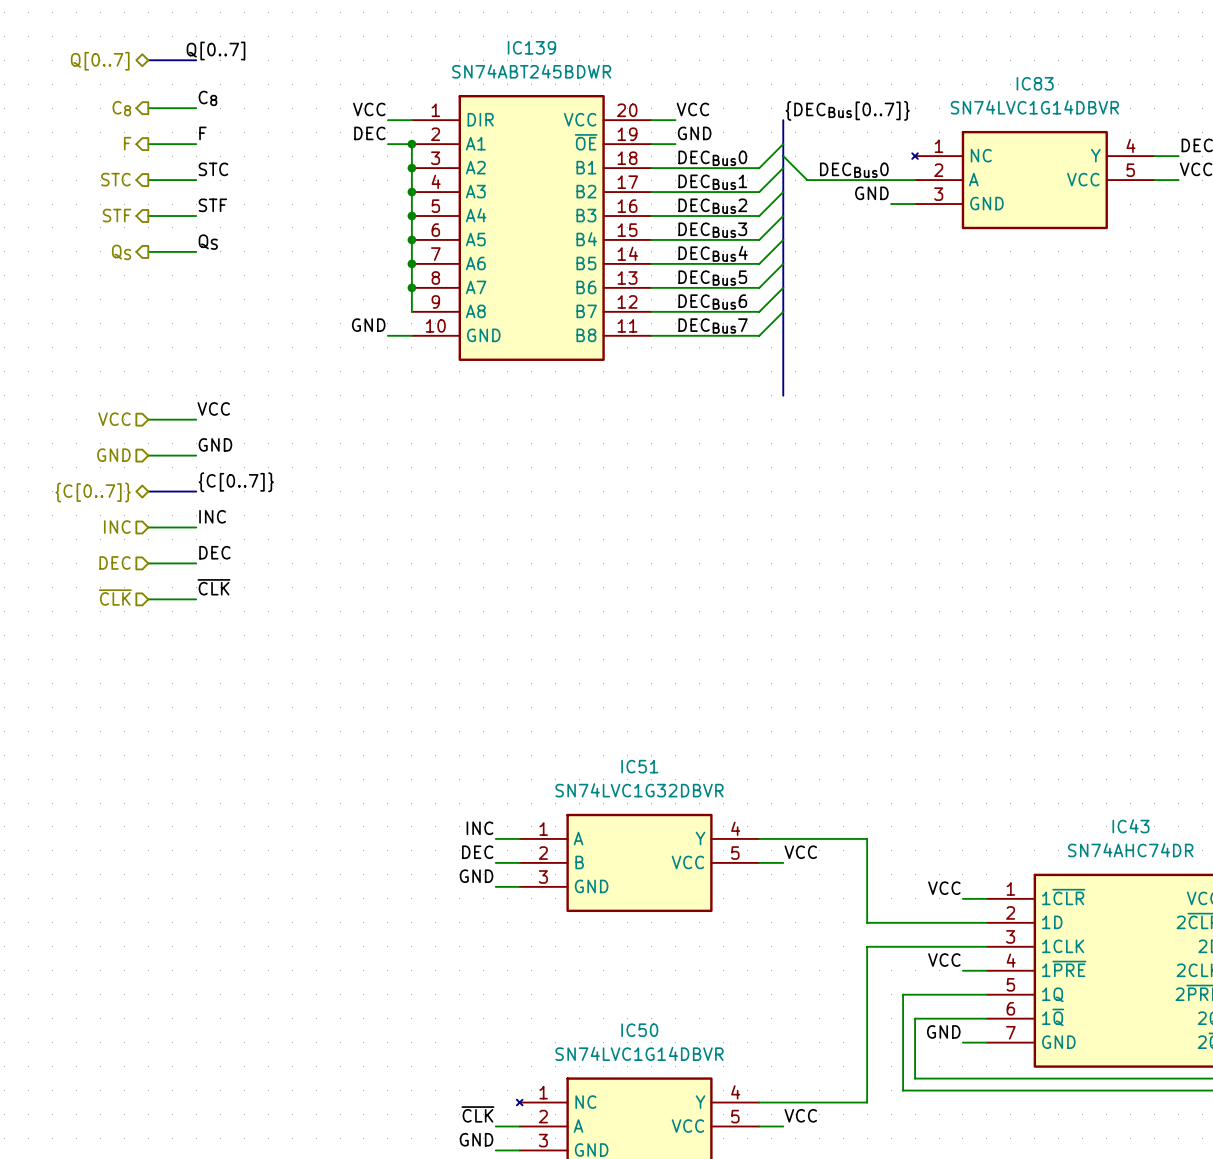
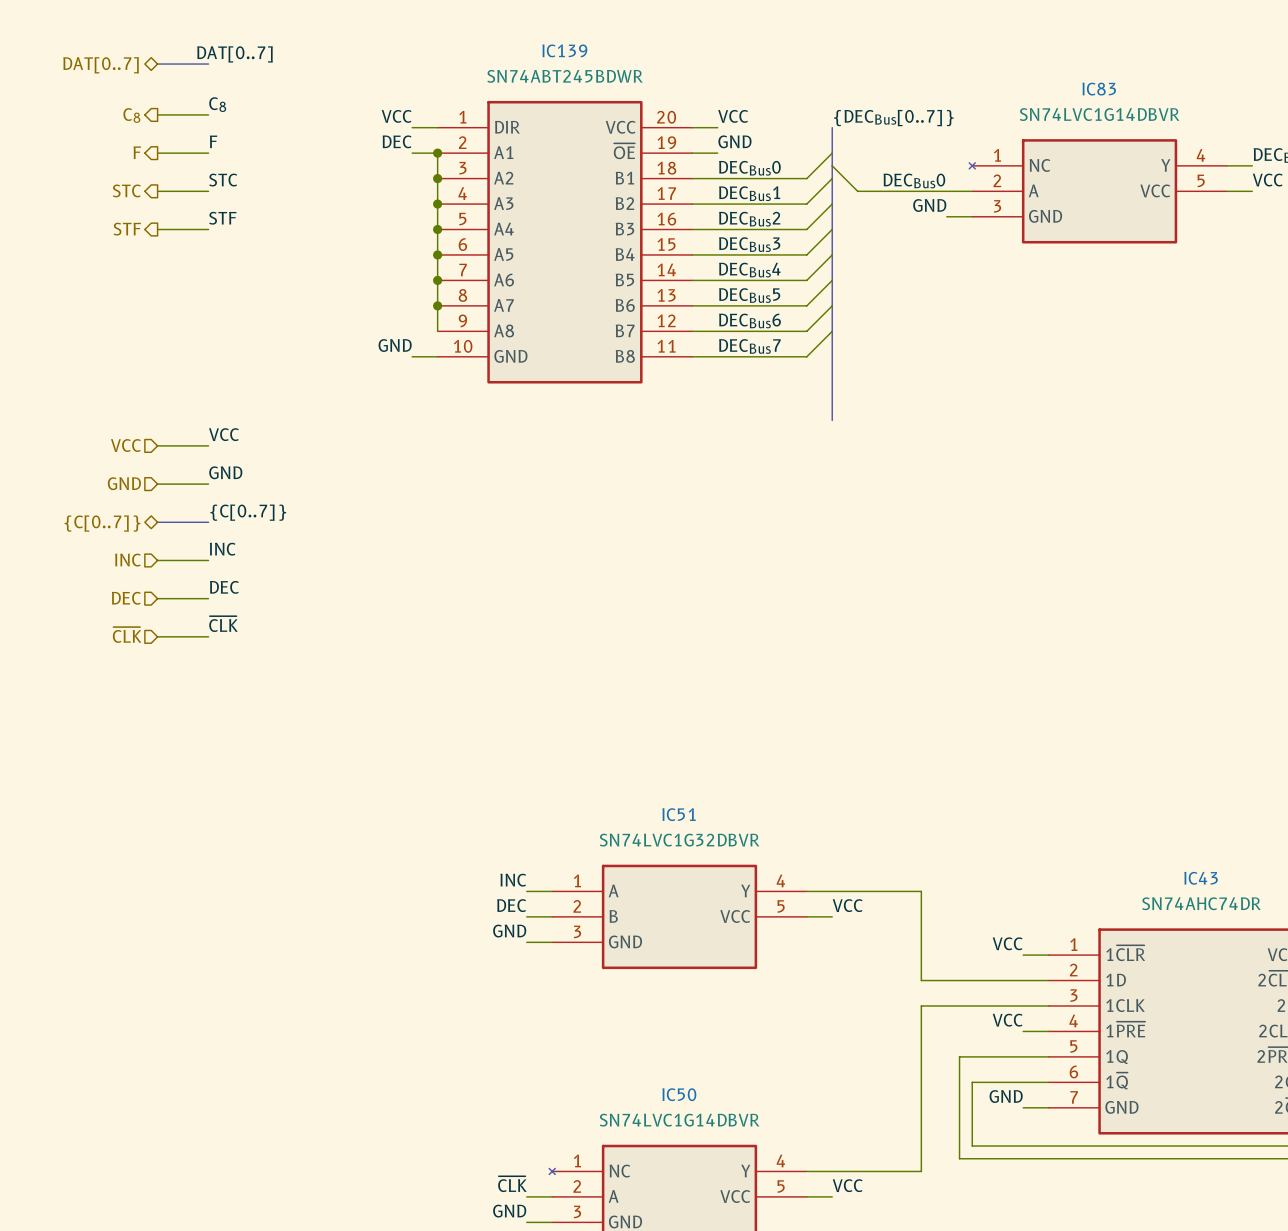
label: Q[0..7] (216, 51) -> DAT[0..7] (235, 54)
hierarchical label: Q[0..7] (100, 61) -> DAT[0..7] (101, 65)
label: QS (208, 242) -> none
wire: (148, 251) (196, 251) -> none
hierarchical label: QS (121, 252) -> none

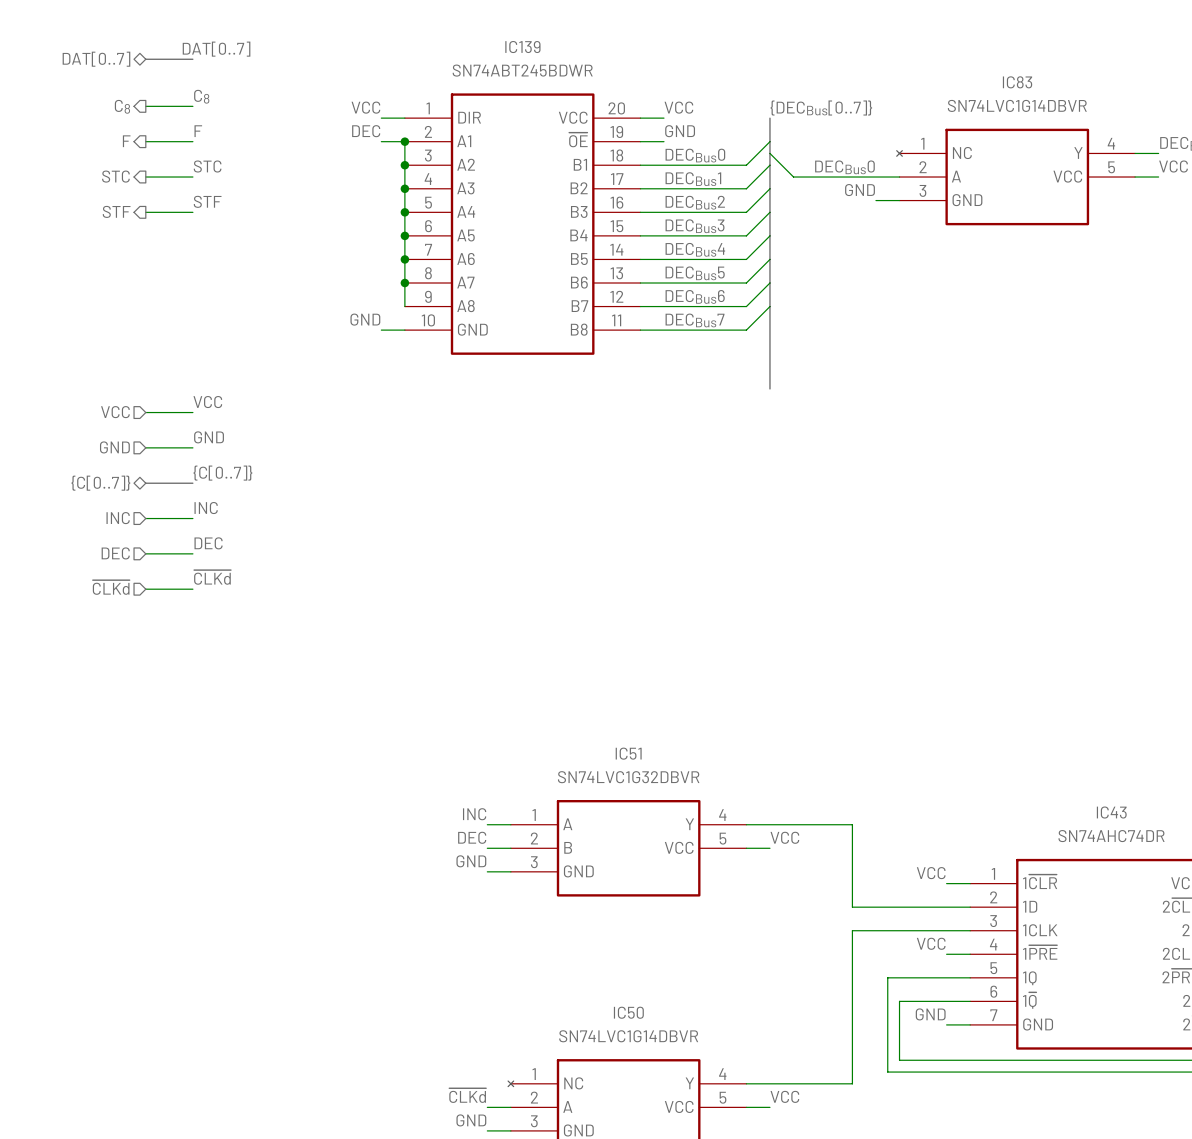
label: ~{CLK} (223, 624) -> ~{CLKd} (212, 577)
hierarchical label: ~{CLK} (127, 634) -> ~{CLKd} (111, 587)
label: ~{CLK} (512, 1184) -> ~{CLKd} (467, 1095)

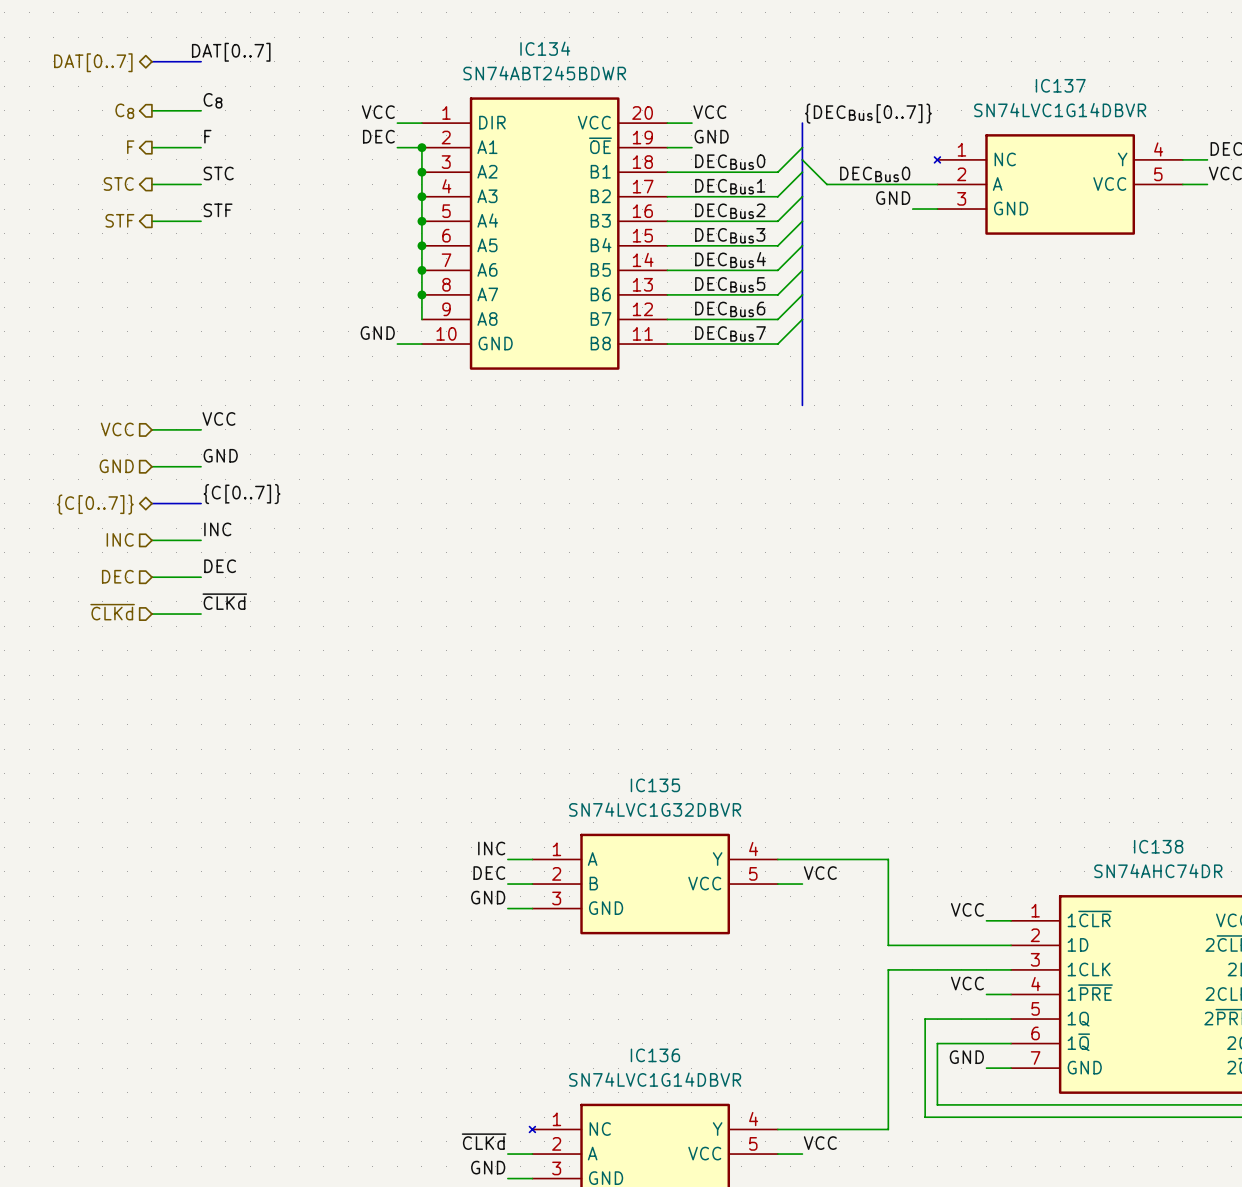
IC139 name: IC139 (522, 47) -> IC134 (545, 48)
IC83 name: IC83 (1017, 82) -> IC137 (1060, 85)
IC51 name: IC51 (628, 753) -> IC135 (655, 785)
IC43 name: IC43 (1111, 812) -> IC138 (1158, 846)
IC50 name: IC50 (628, 1012) -> IC136 (655, 1055)

